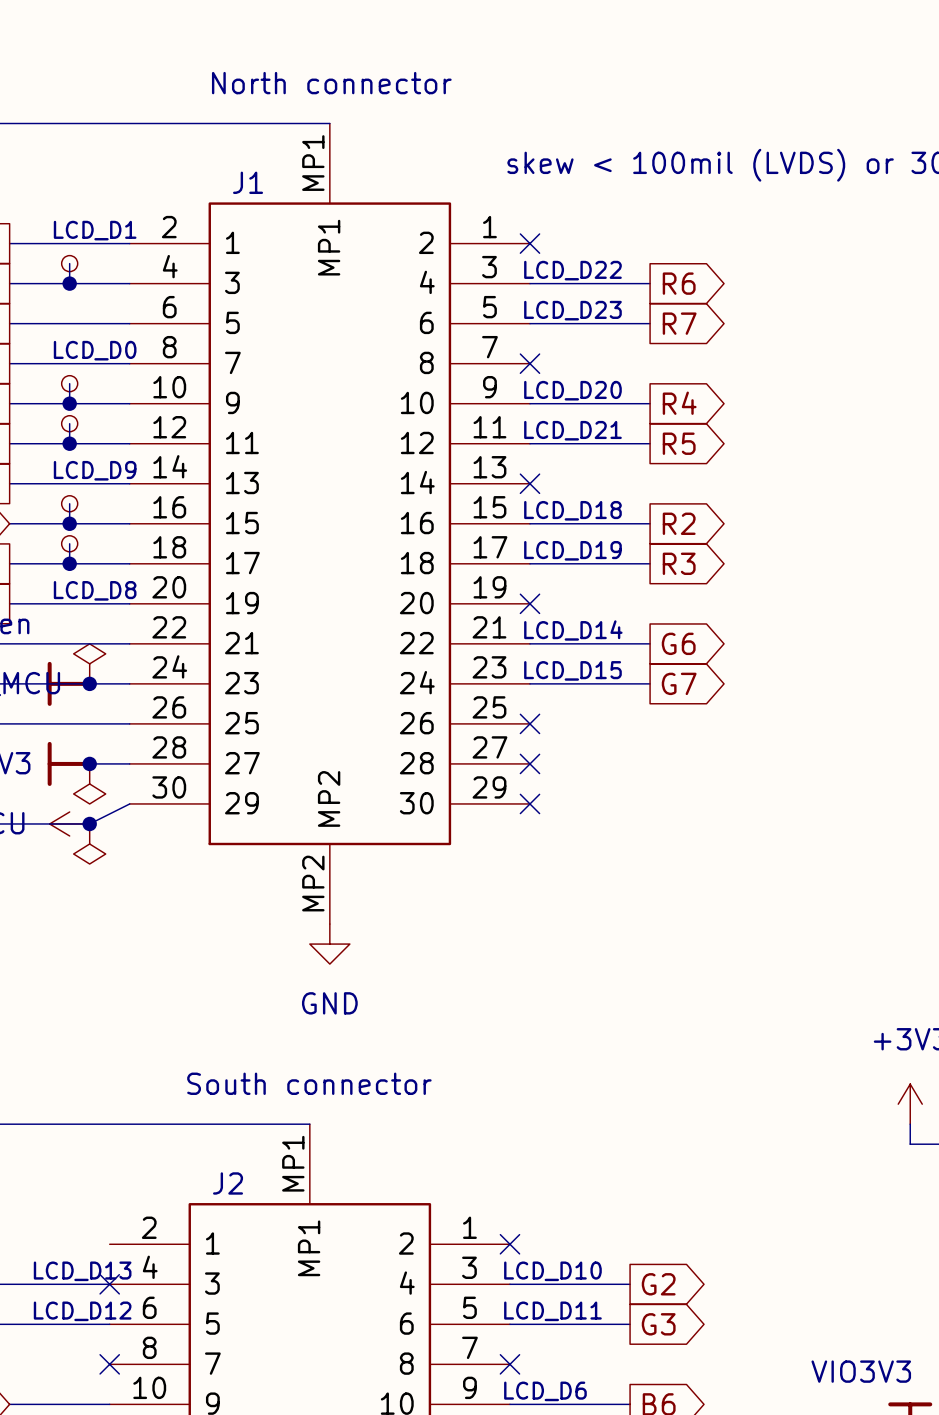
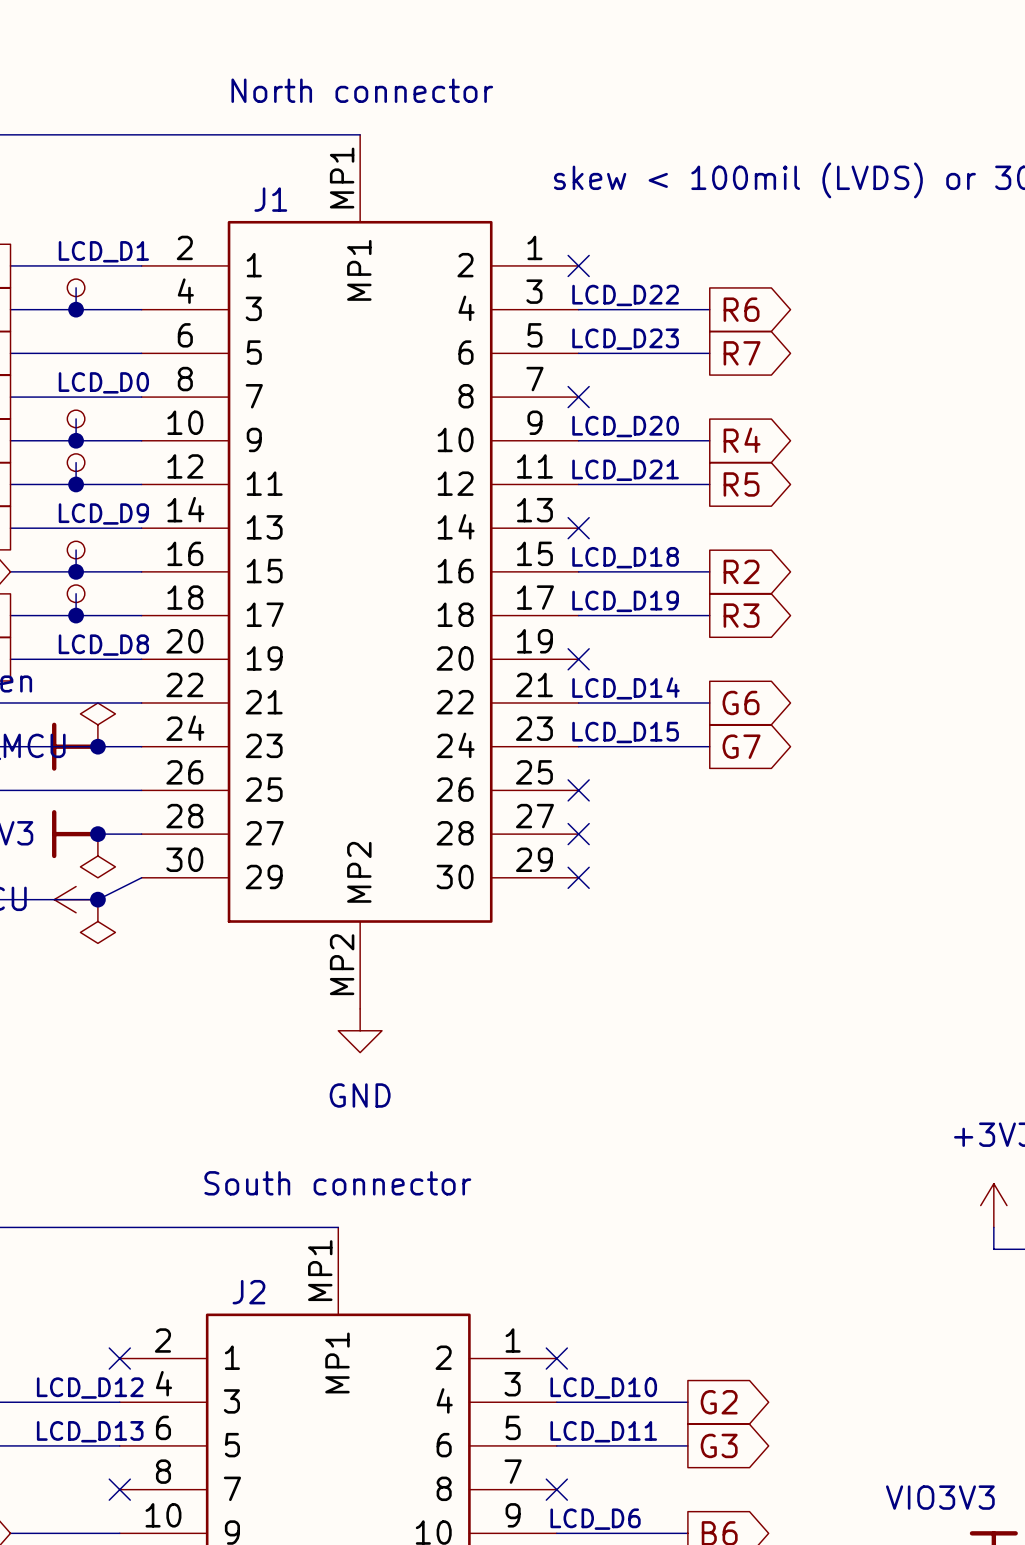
text: LCD_D13 (82, 1271) -> LCD_D12 (90, 1388)
no-connect mark position: (109, 1284) -> (119, 1358)
text: LCD_D12 (82, 1311) -> LCD_D13 (90, 1431)

